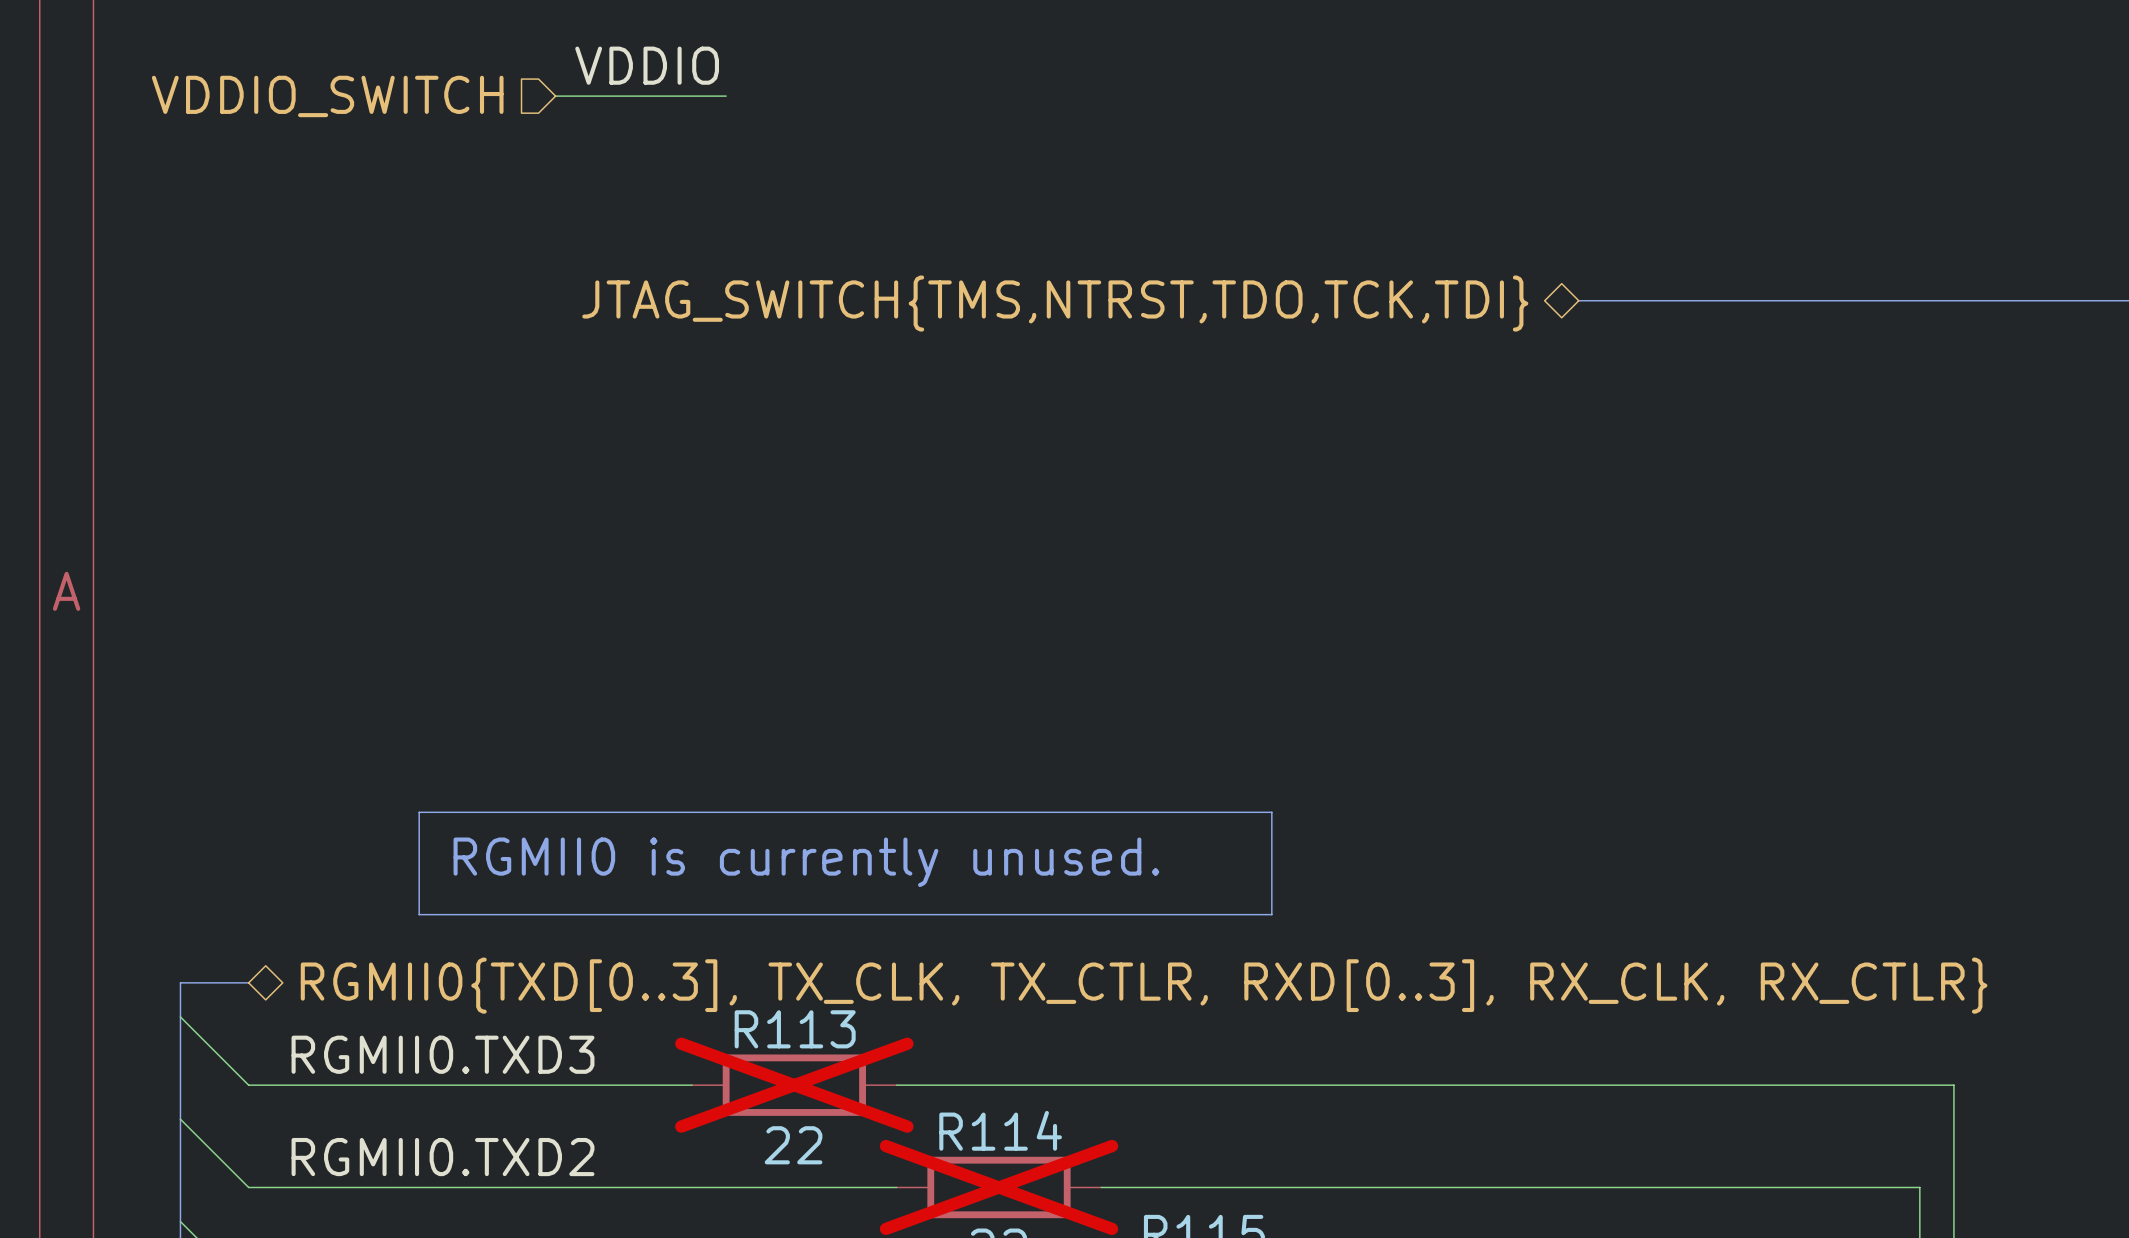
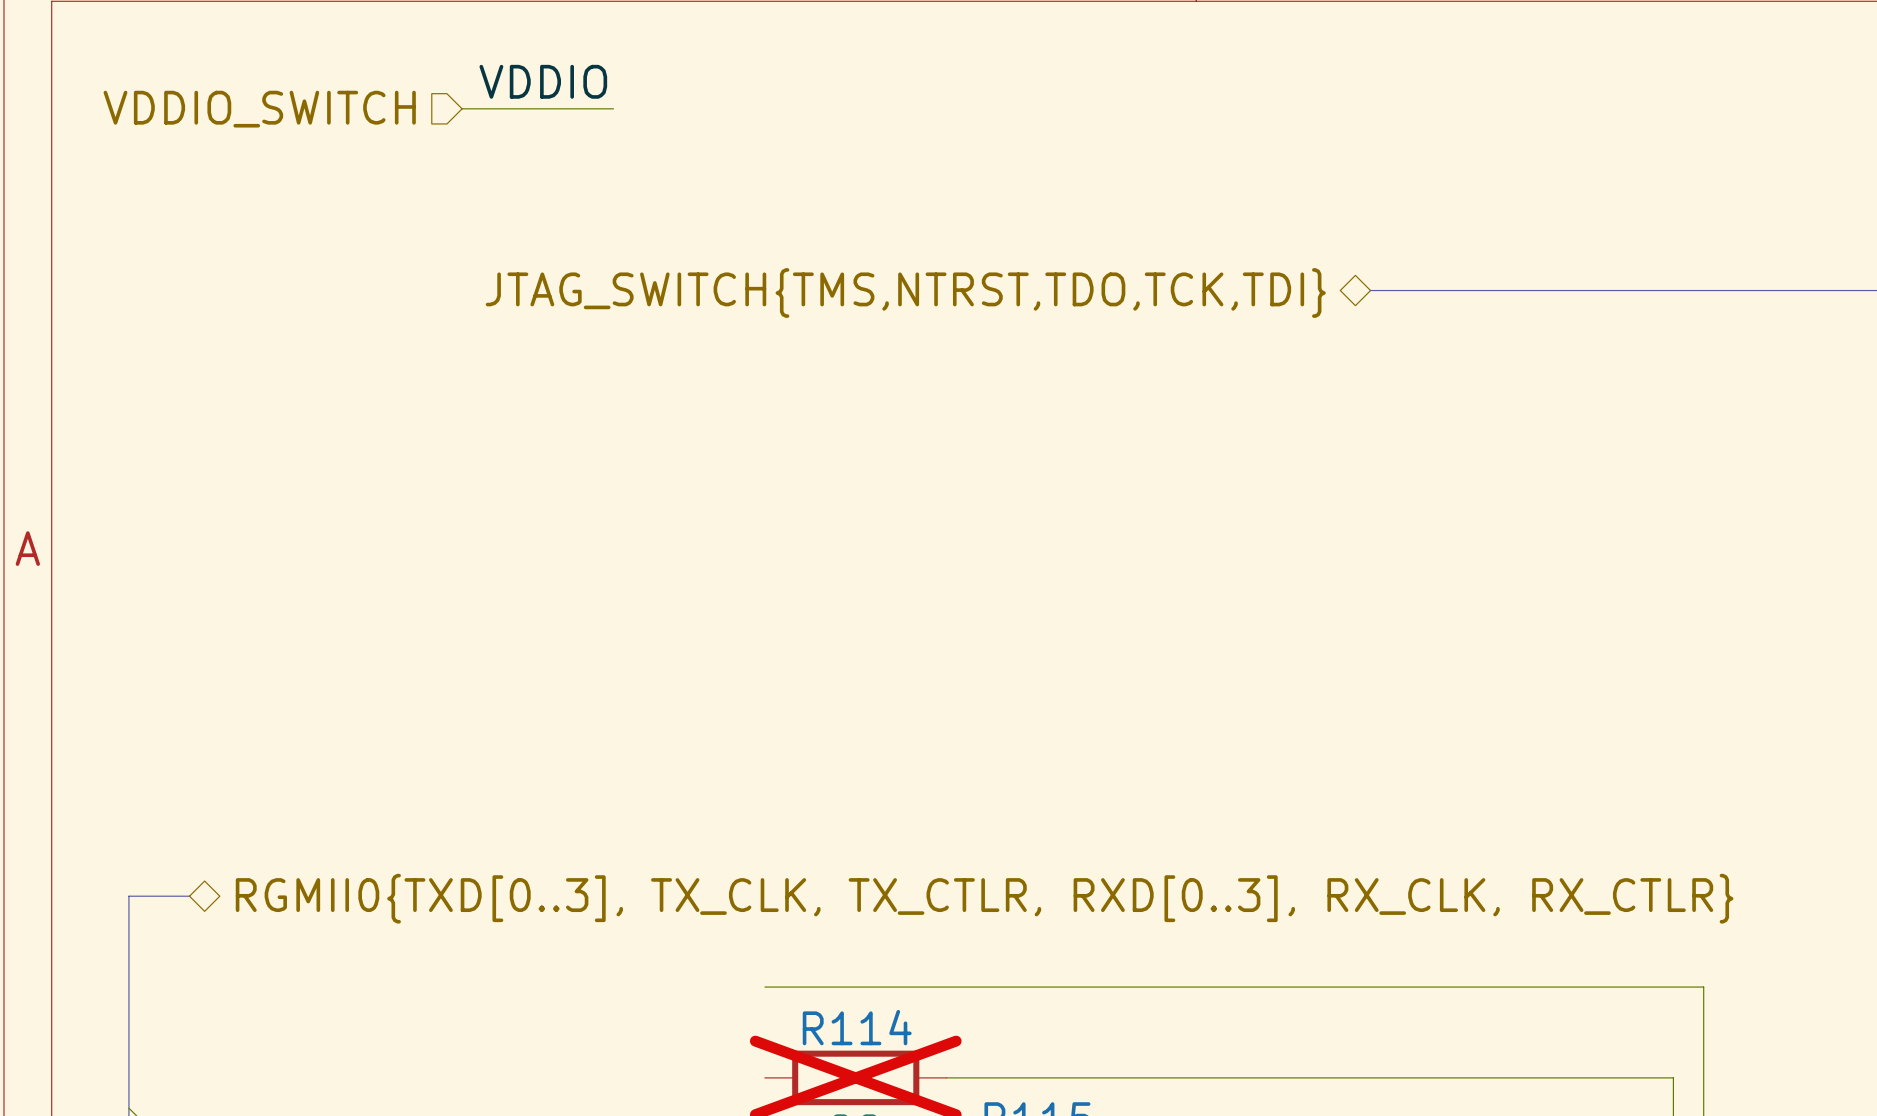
line: (419, 812) (1271, 812) (1271, 914) (419, 914) (419, 812) -> none
text: RGMII0 is currently unused. (806, 862) -> none
wire: (180, 1016) (248, 1085) (692, 1085) -> none
label: RGMII0.TXD3 (443, 1054) -> none
R113: 22 (794, 1085) -> none
wire: (180, 1119) (248, 1187) (896, 1187) -> none
label: RGMII0.TXD2 (443, 1157) -> none

